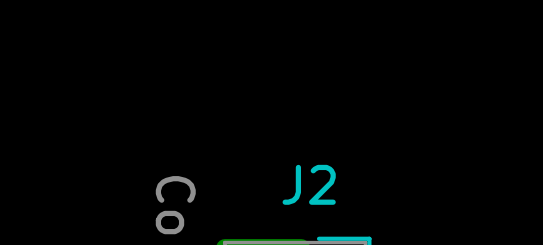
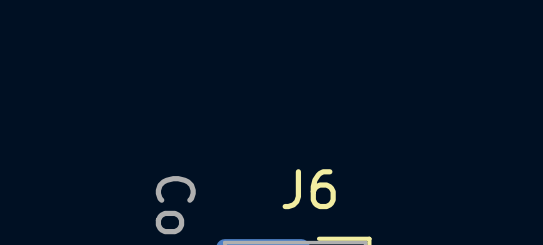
J2 name: J2 (309, 184) -> J6 (309, 189)

